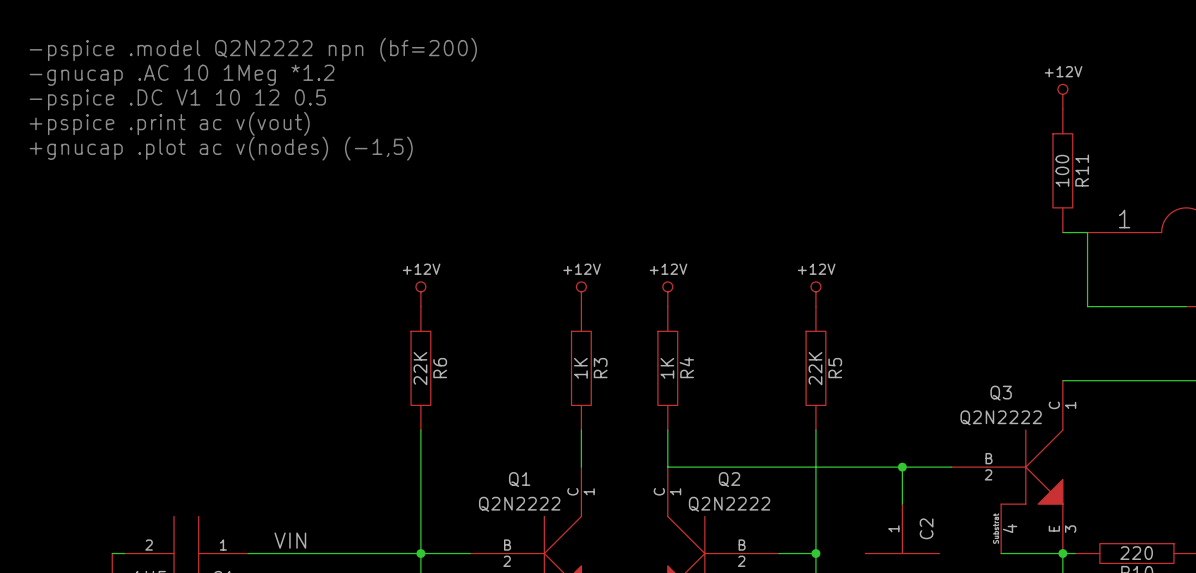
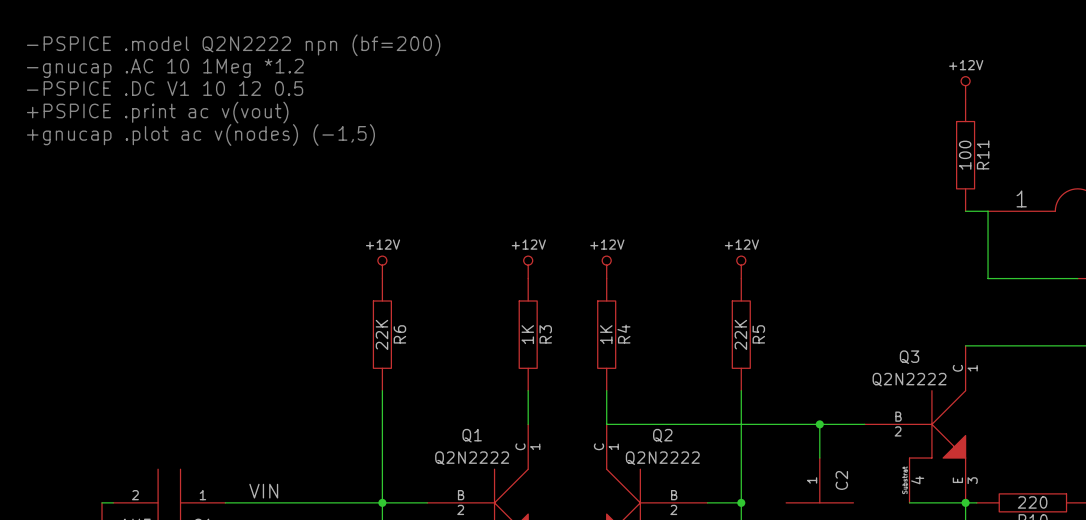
text: -pspice .model Q2N2222 npn (bf=200) (253, 49) -> -PSPICE .model Q2N2222 npn (bf=200) (233, 45)
text: -pspice .DC V1 10 12 0.5 (177, 99) -> -PSPICE .DC V1 10 12 0.5 (165, 88)
text: +pspice .print ac v(vout) (169, 123) -> +PSPICE .print ac v(vout) (157, 112)

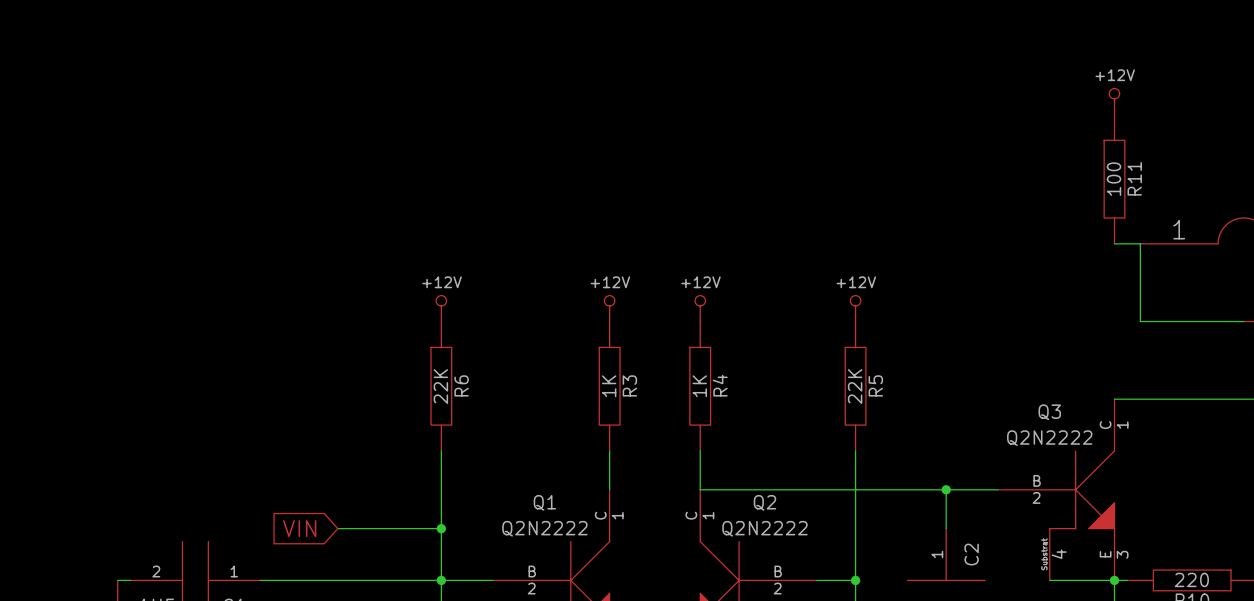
text: -PSPICE .model Q2N2222 npn (bf=200) (233, 45) -> none
text: -gnucap .AC 10 1Meg *1.2 (165, 68) -> none
text: -PSPICE .DC V1 10 12 0.5 (165, 88) -> none
text: +PSPICE .print ac v(vout) (157, 112) -> none
text: +gnucap .plot ac v(nodes) (-1,5) (200, 135) -> none
global label: none -> VIN (299, 528)
wire: none -> (337, 528) (441, 528)
junction: none -> (441, 528)
label: VIN (263, 491) -> none

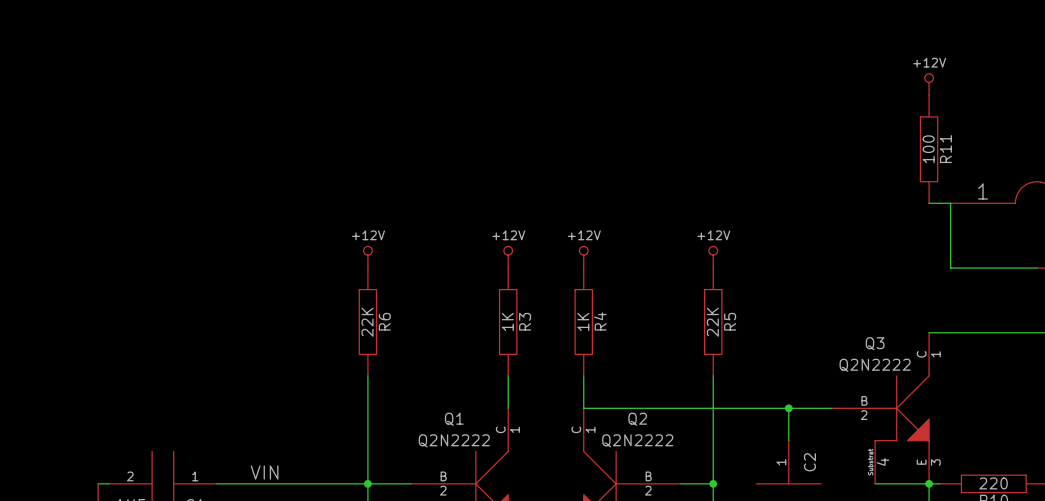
global label: VIN (299, 528) -> none
wire: (337, 528) (441, 528) -> none
junction: (441, 528) -> none
label: none -> VIN (264, 472)

